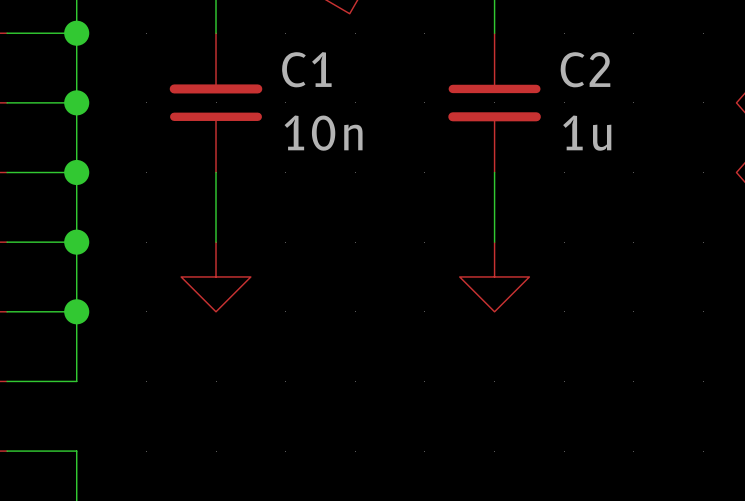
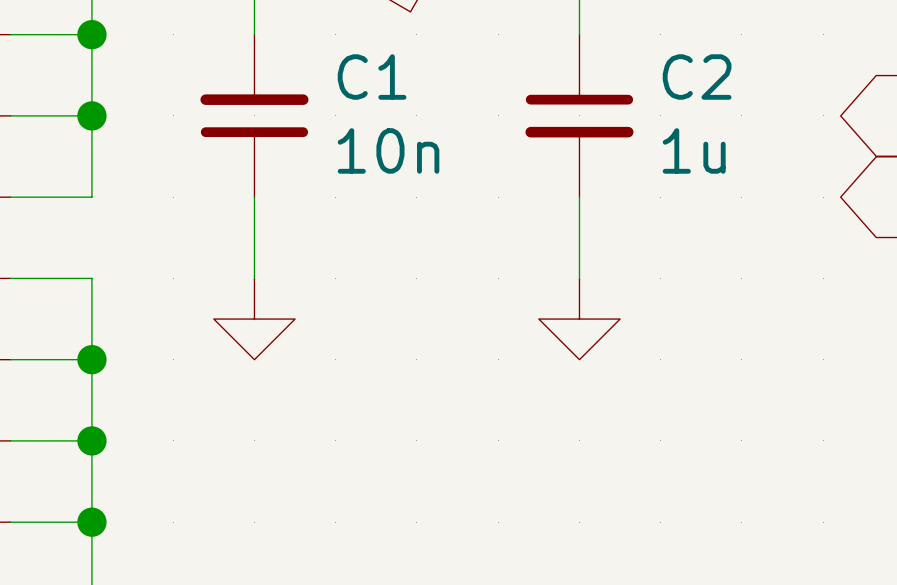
wire: (76, 172) (76, 242) -> (91, 440) (91, 522)
junction: (76, 172) -> none
junction: (76, 242) -> none
junction: none -> (91, 440)
junction: none -> (91, 522)

